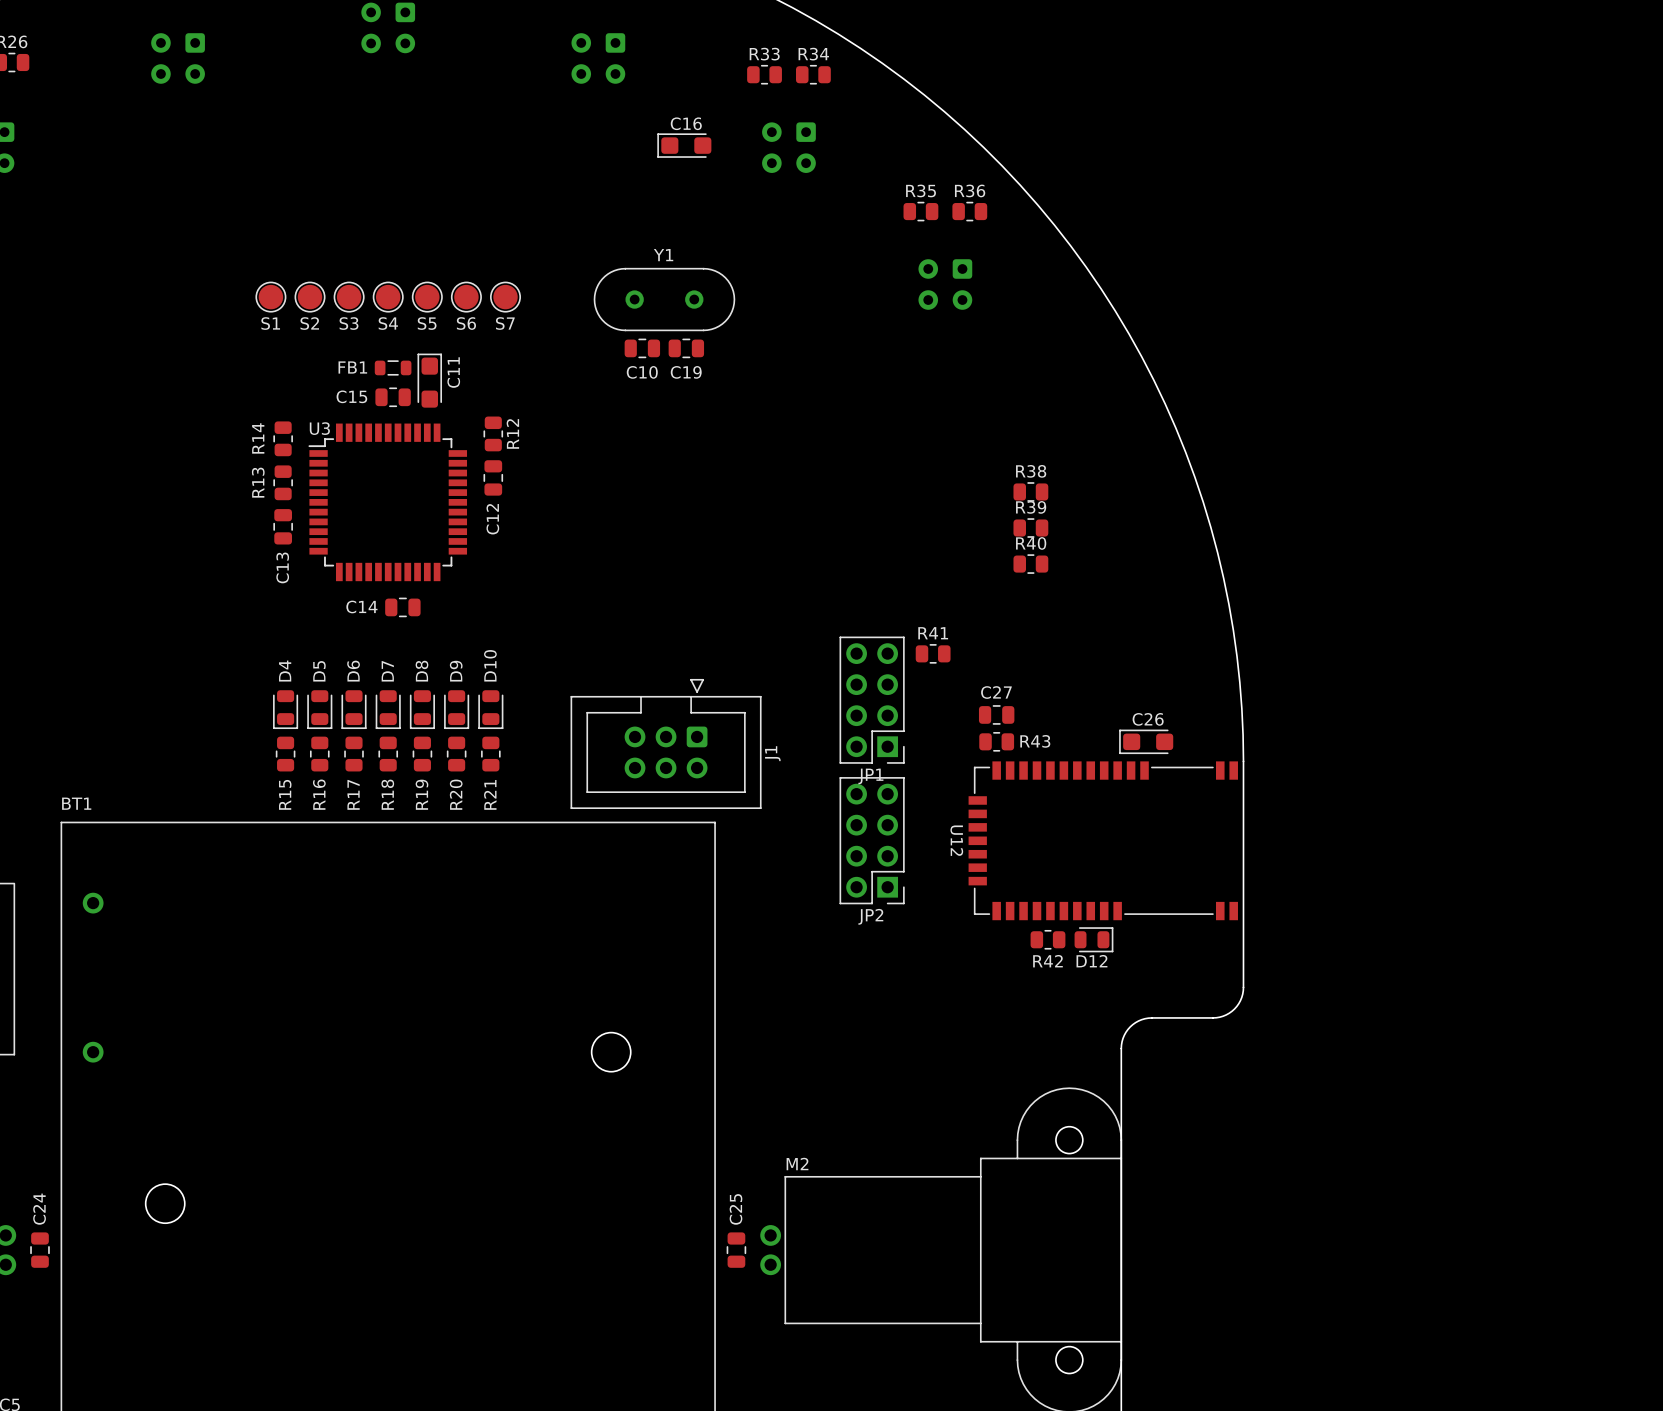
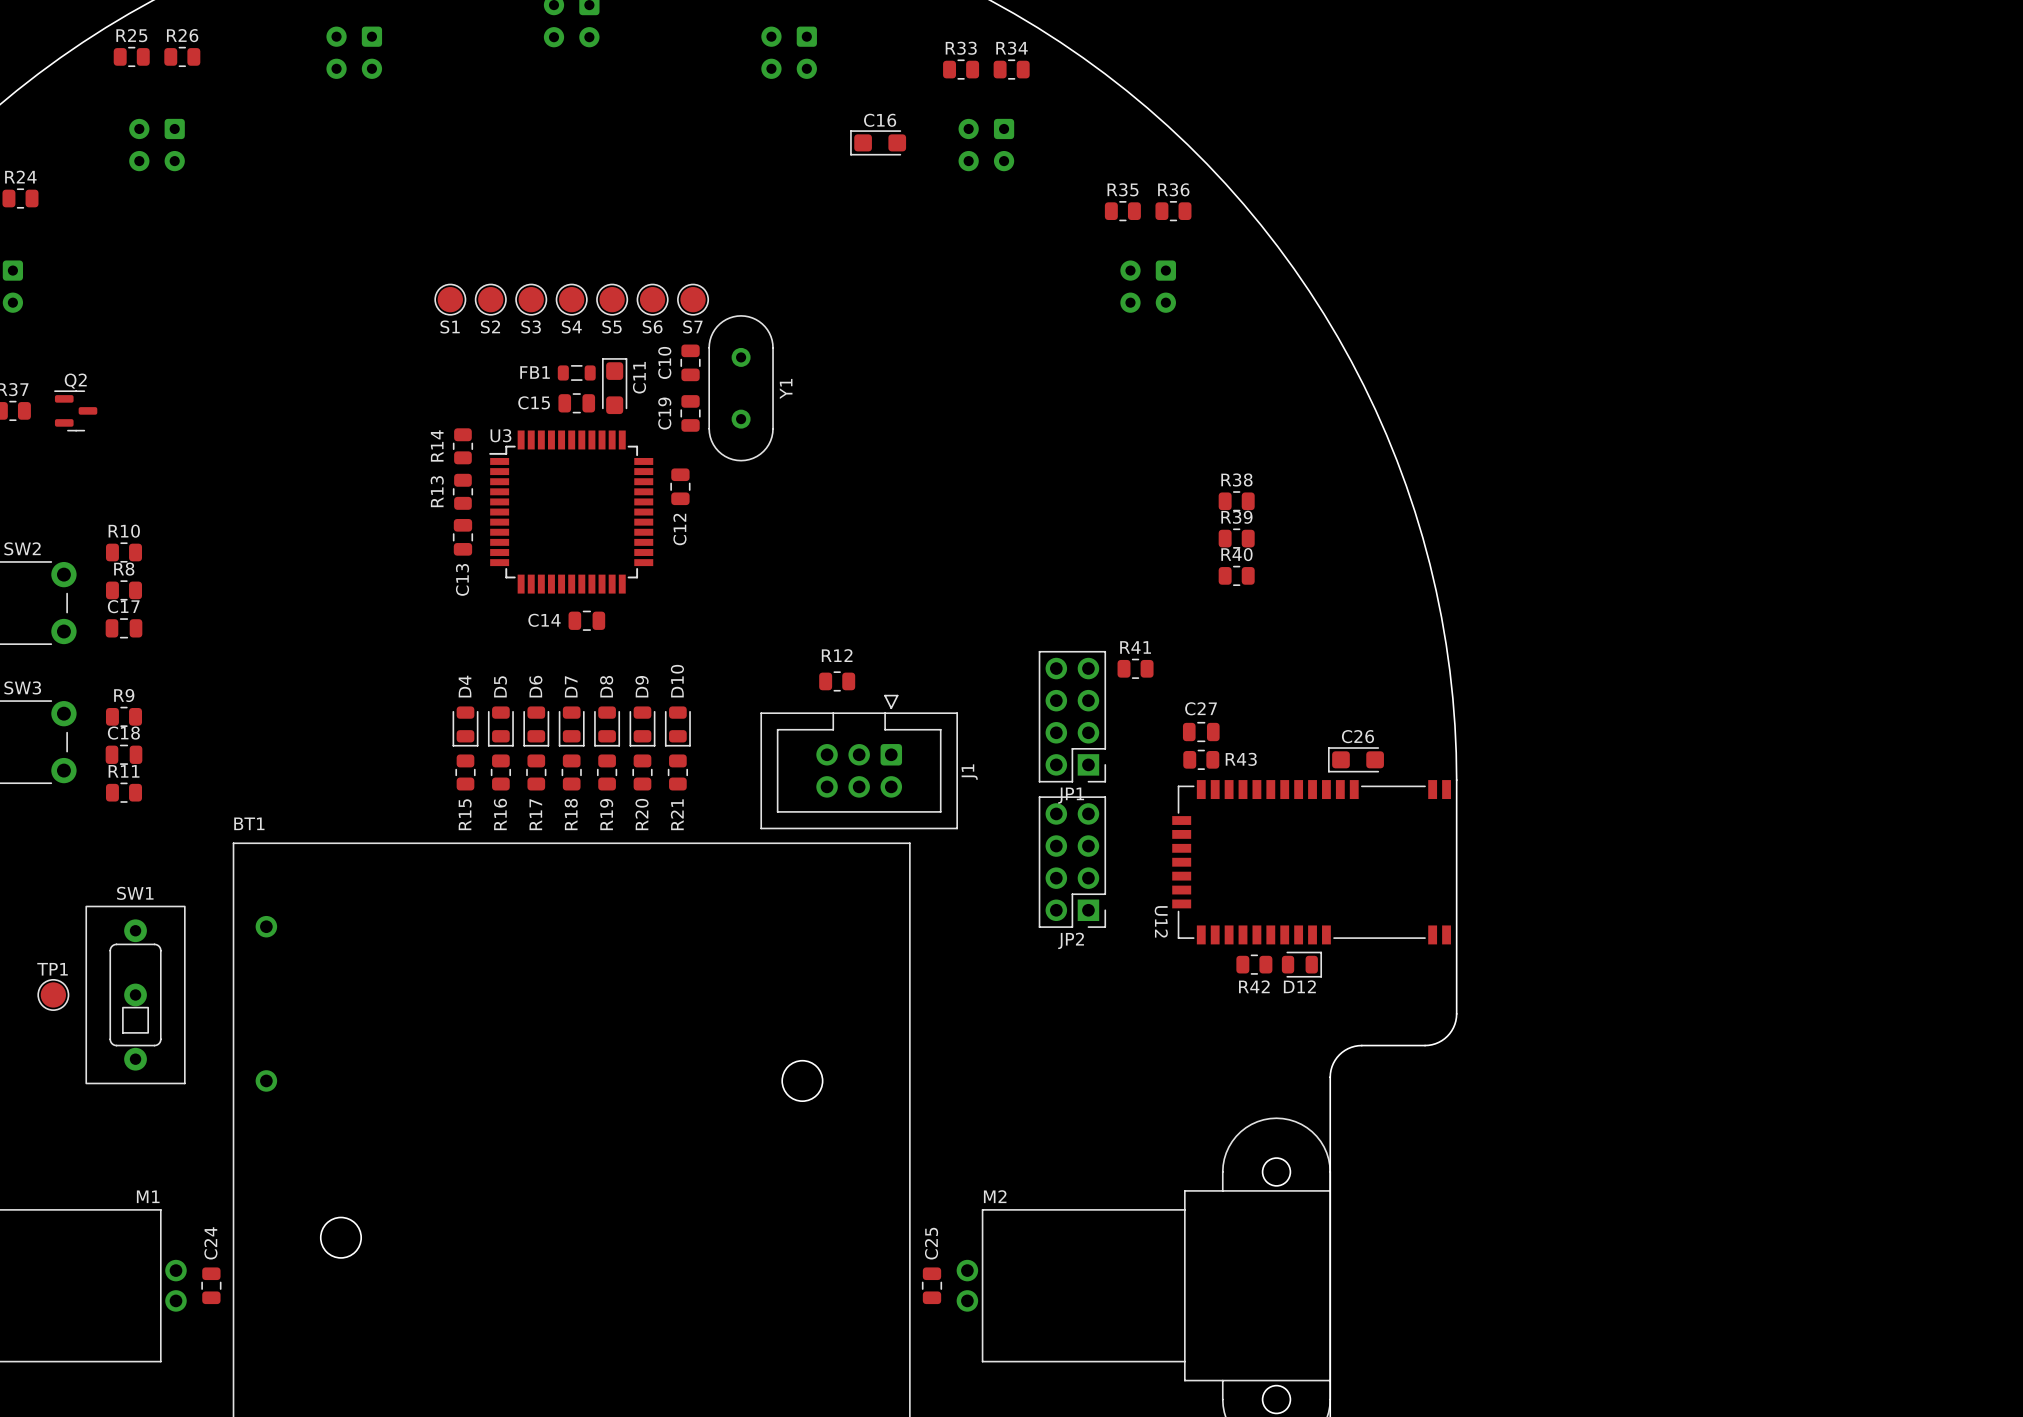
Y1 rotation: 0° (664, 299) -> 90° clockwise (741, 388)
Y1 position: (664, 299) -> (741, 388)
C10 rotation: 0° (642, 348) -> 90° clockwise (690, 362)
C10 position: (642, 348) -> (690, 362)
C19 rotation: 0° (686, 348) -> 90° clockwise (690, 413)
C19 position: (686, 348) -> (690, 413)
R12 rotation: 0° (493, 433) -> 90° clockwise (837, 681)
R12 position: (493, 433) -> (837, 681)
R12 name position: R12 (512, 433) -> R12 (837, 655)
U12 name position: U12 (956, 840) -> U12 (1161, 921)

